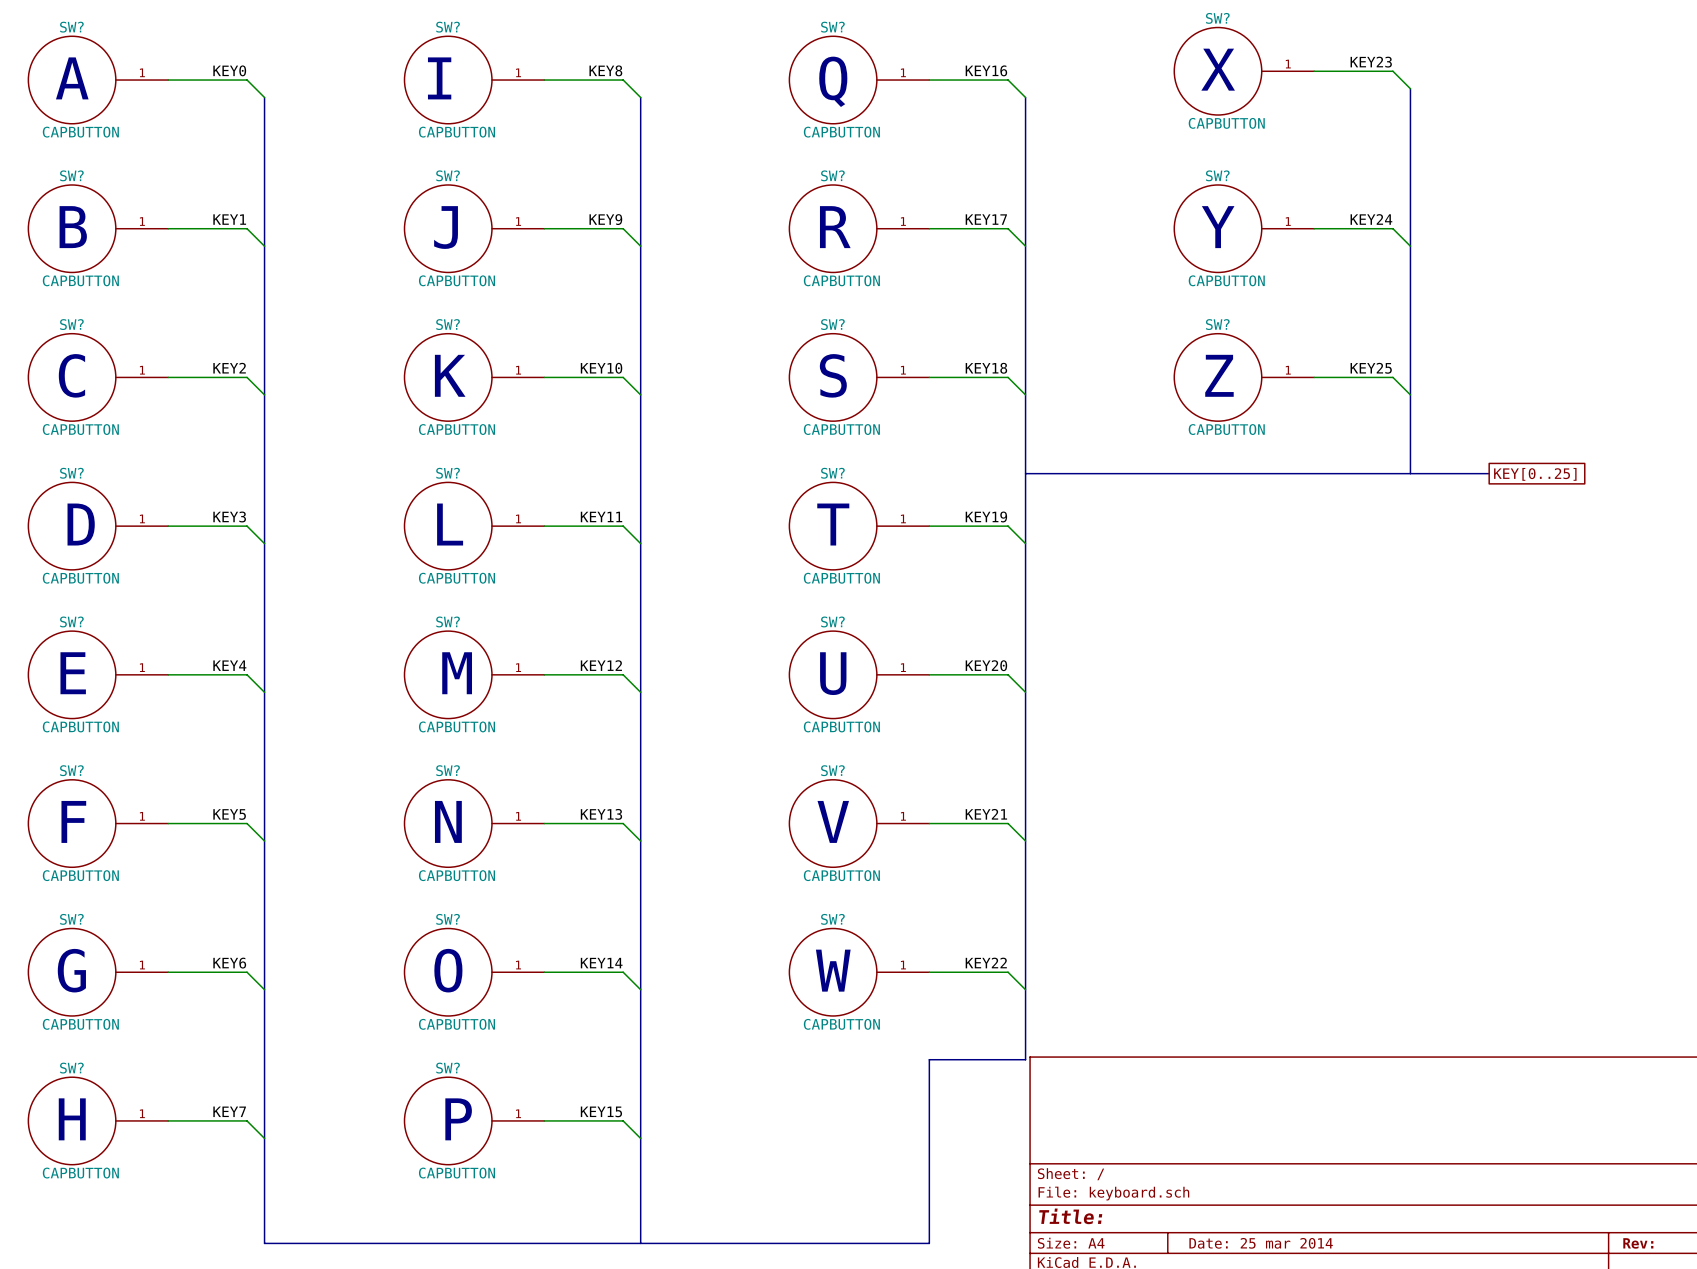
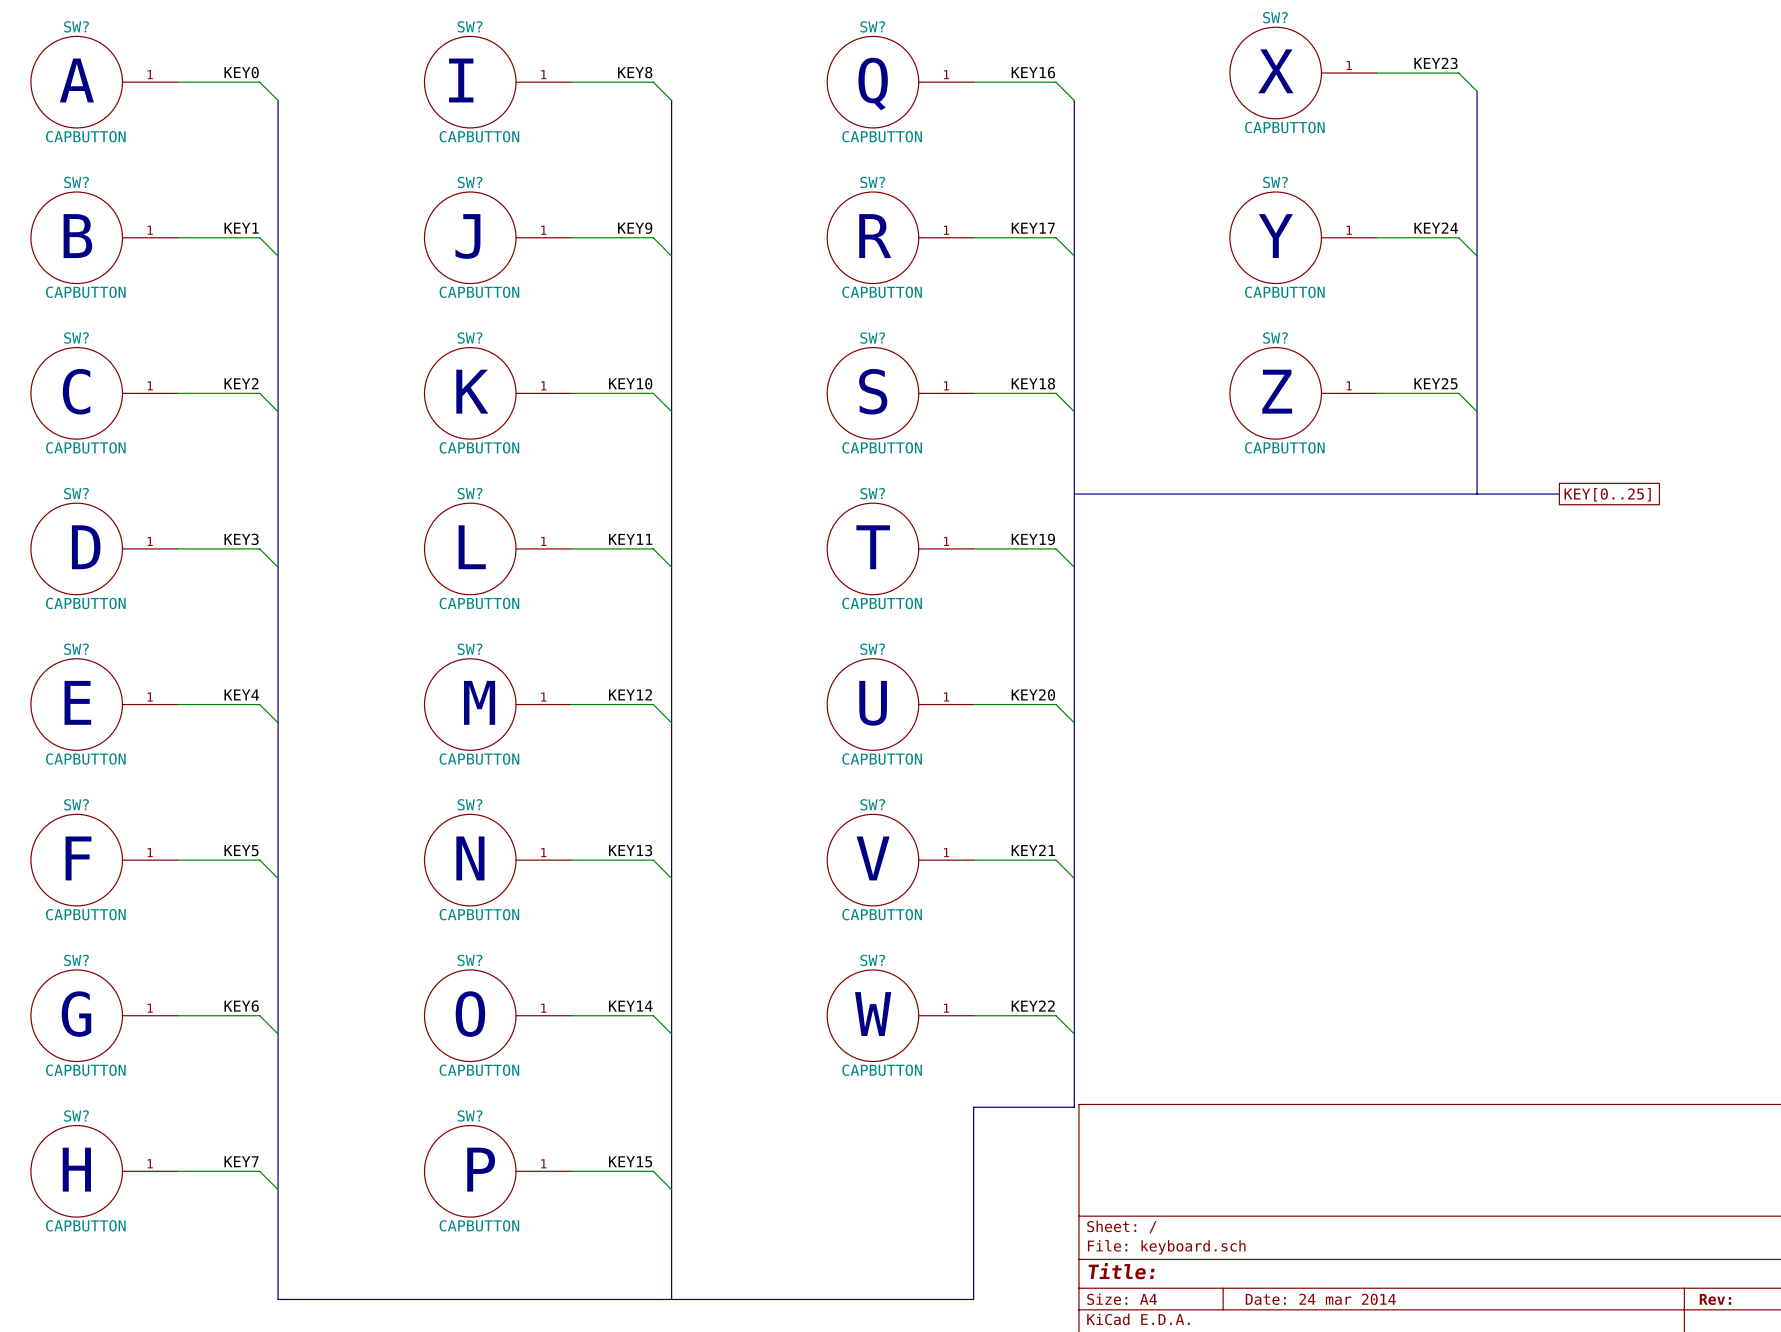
title block: Date: 25 mar 2014 (1261, 1243) -> Date: 24 mar 2014 (1320, 1299)

